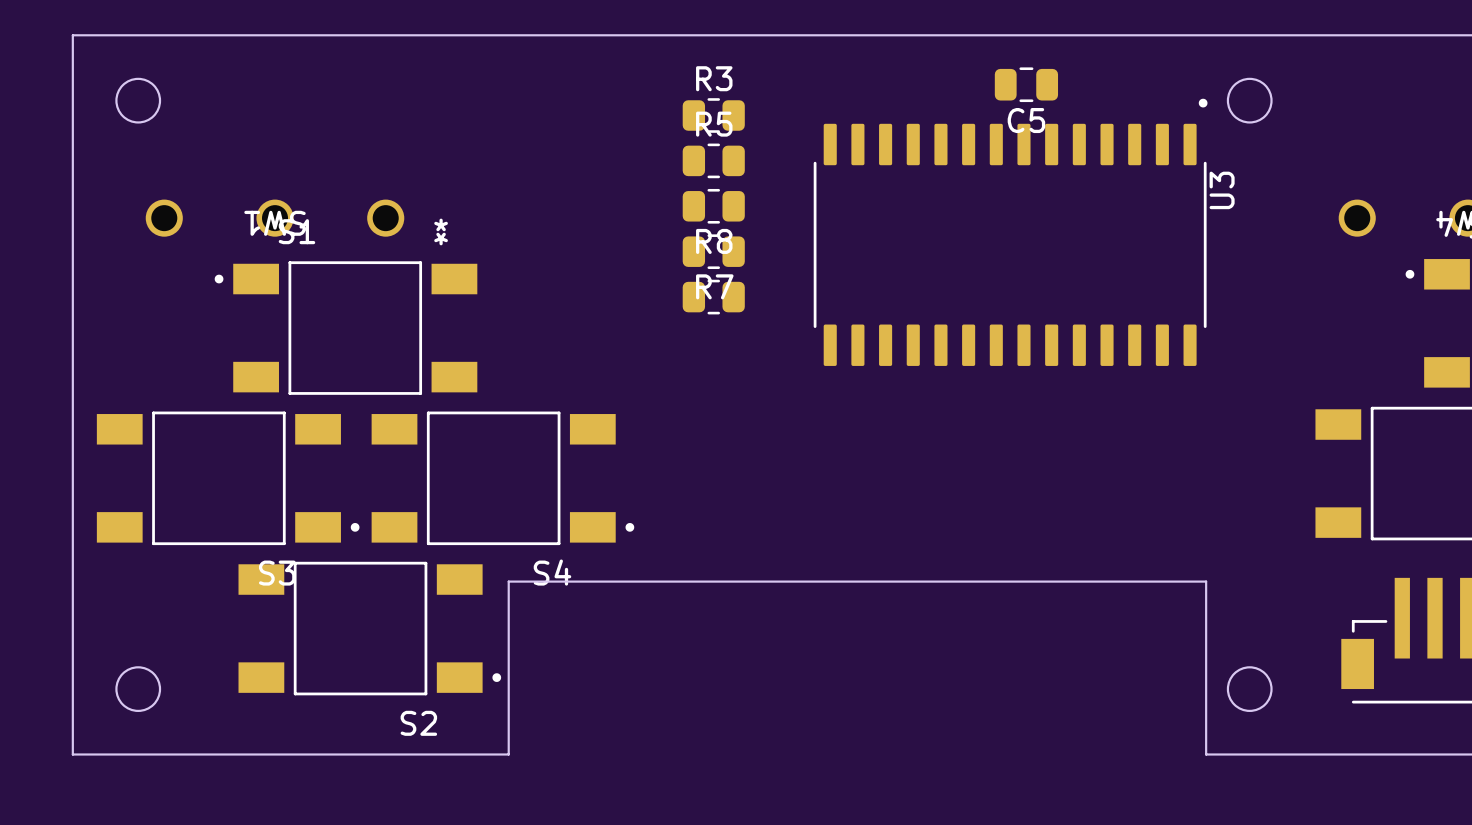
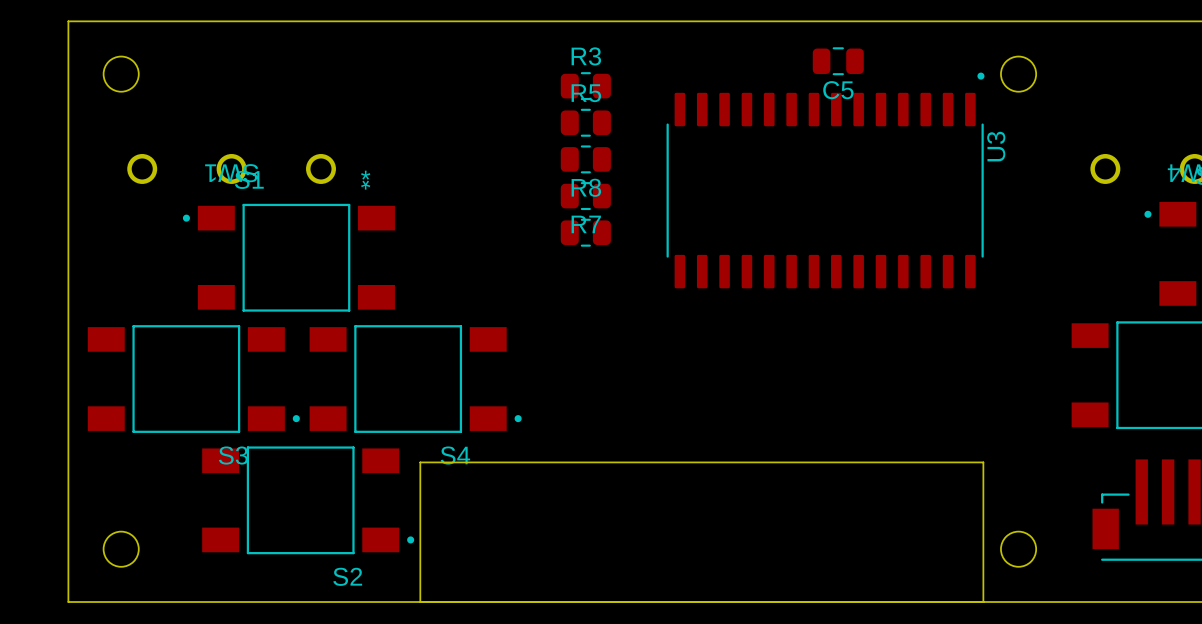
board edge: none -> (420, 602) (983, 602)

